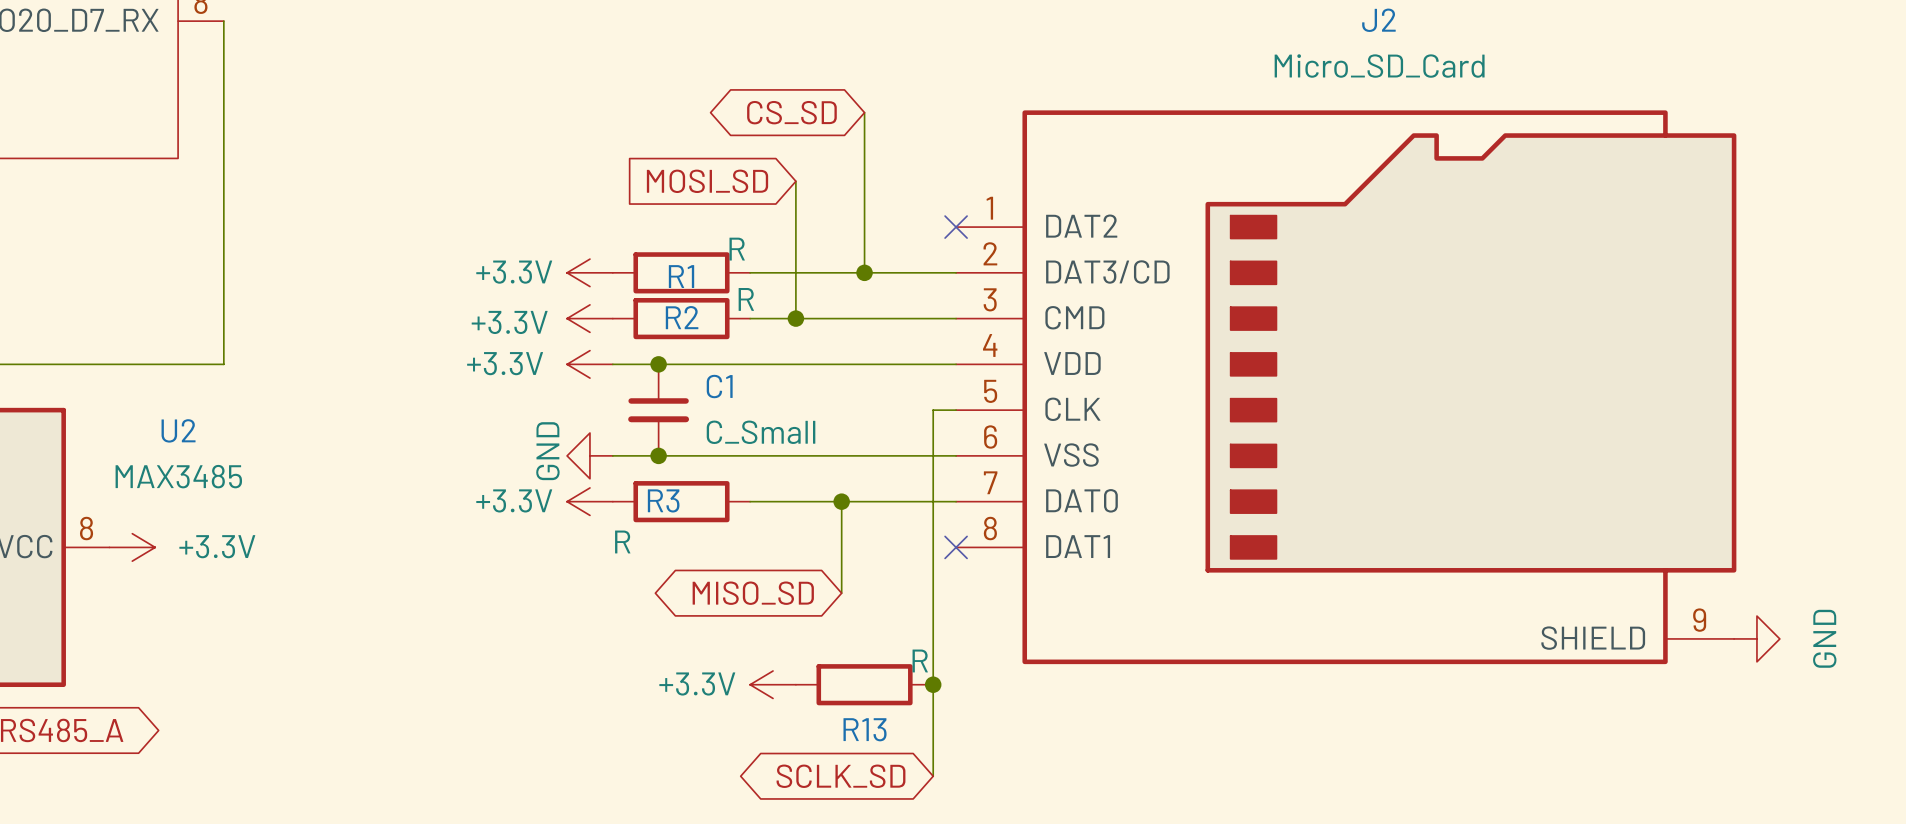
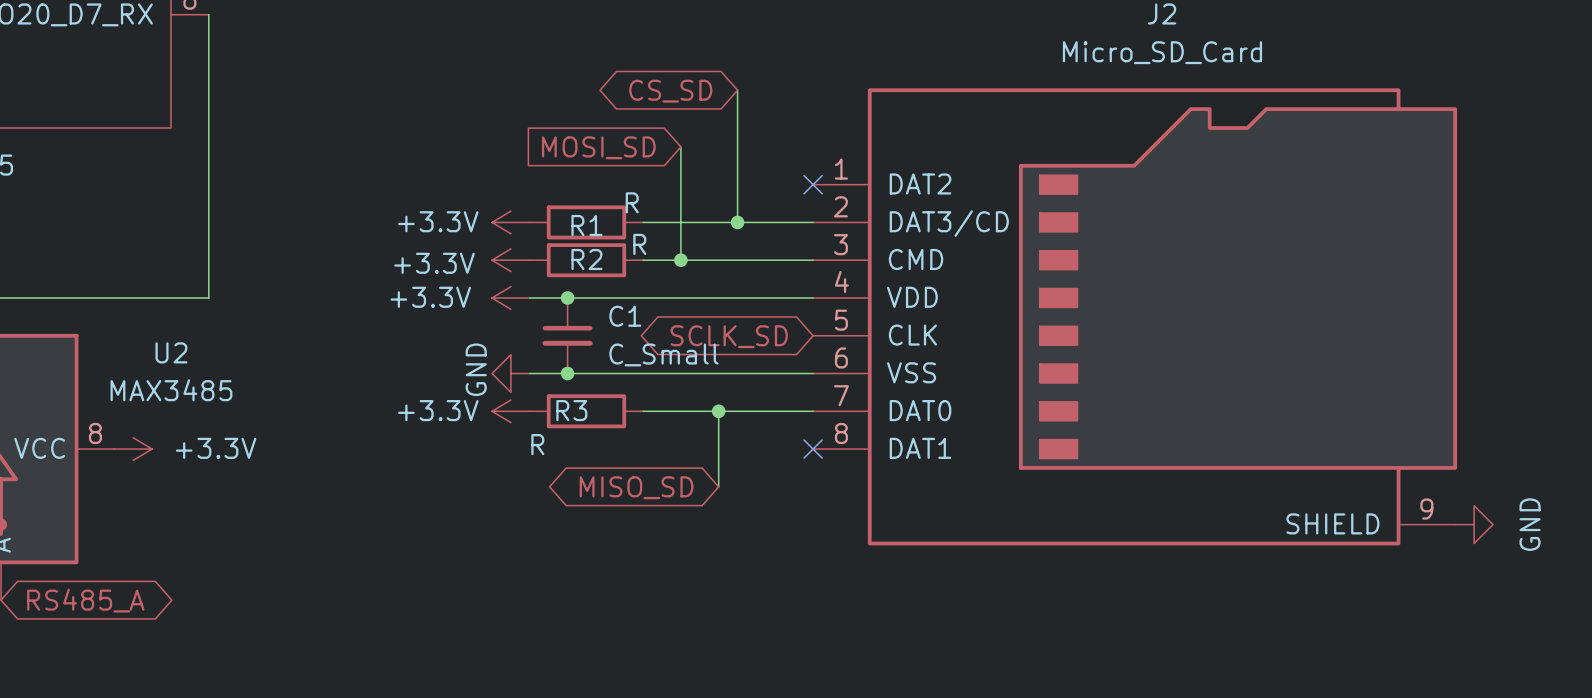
wire: (956, 410) (933, 410) (933, 776) -> none
power symbol: +3.3V (773, 684) -> none
R13: R (864, 684) -> none
junction: (933, 684) -> none
global label position: SCLK_SD (841, 776) -> SCLK_SD (729, 336)

